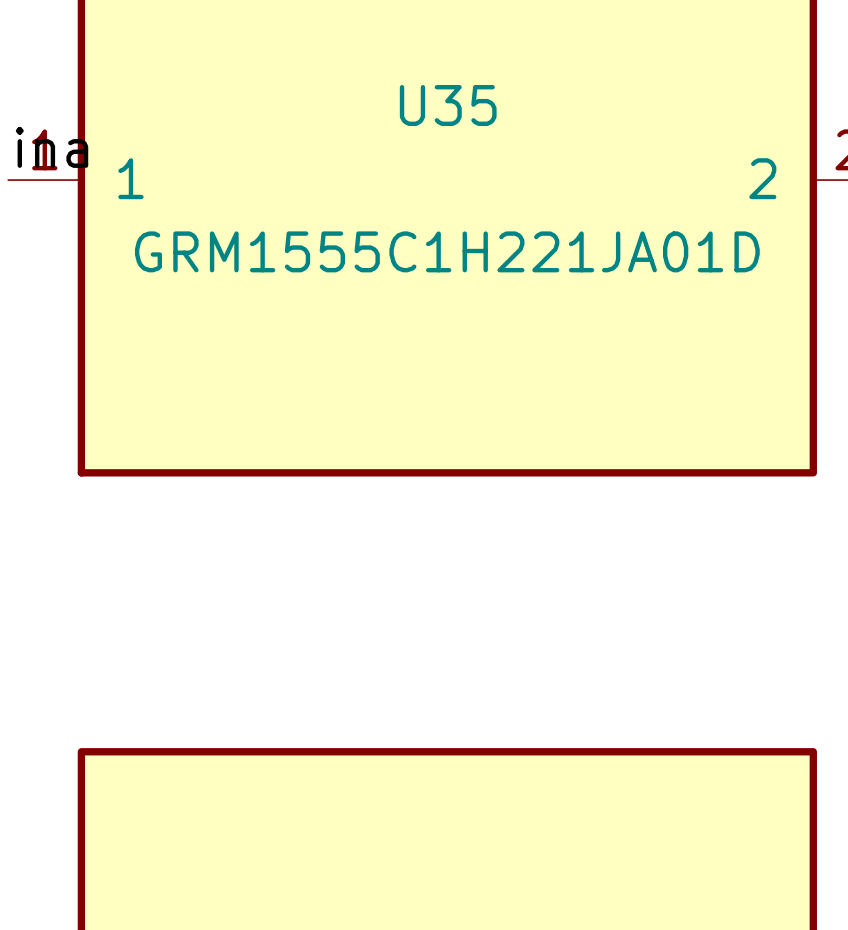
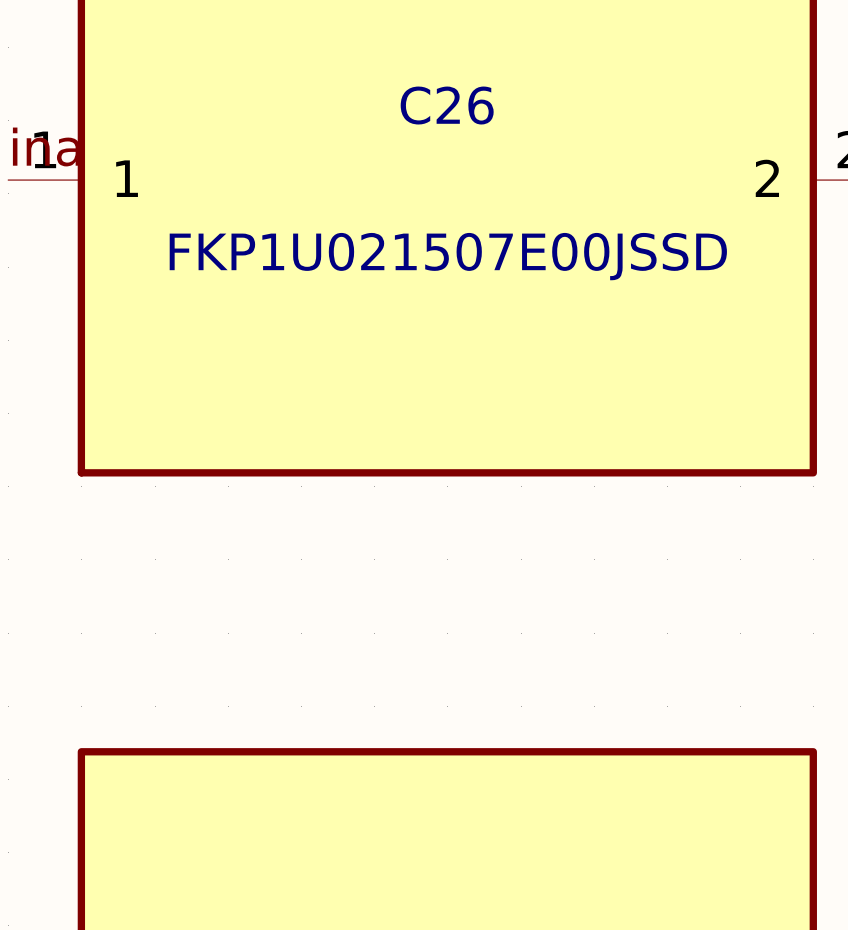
U35 name: U35 (448, 105) -> C26 (447, 105)
U35 value: GRM1555C1H221JA01D (447, 251) -> FKP1U021507E00JSSD (448, 256)

